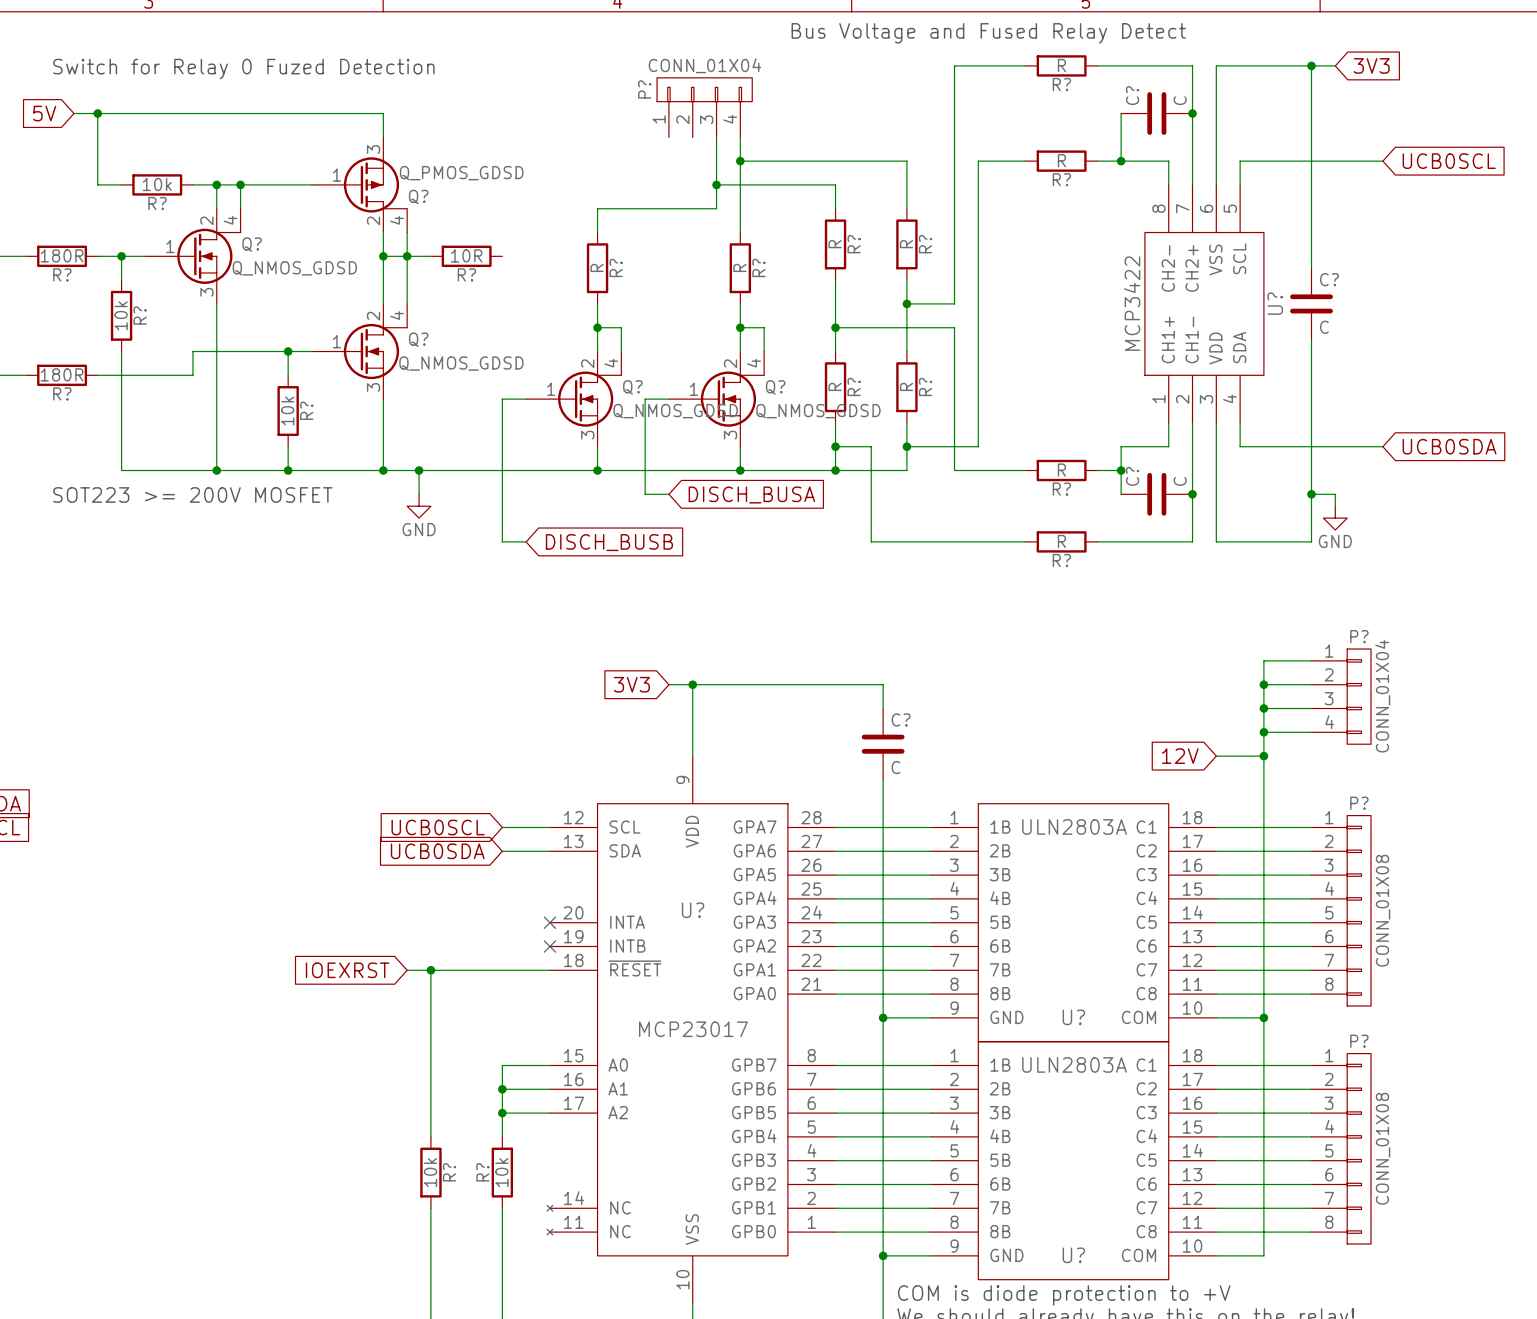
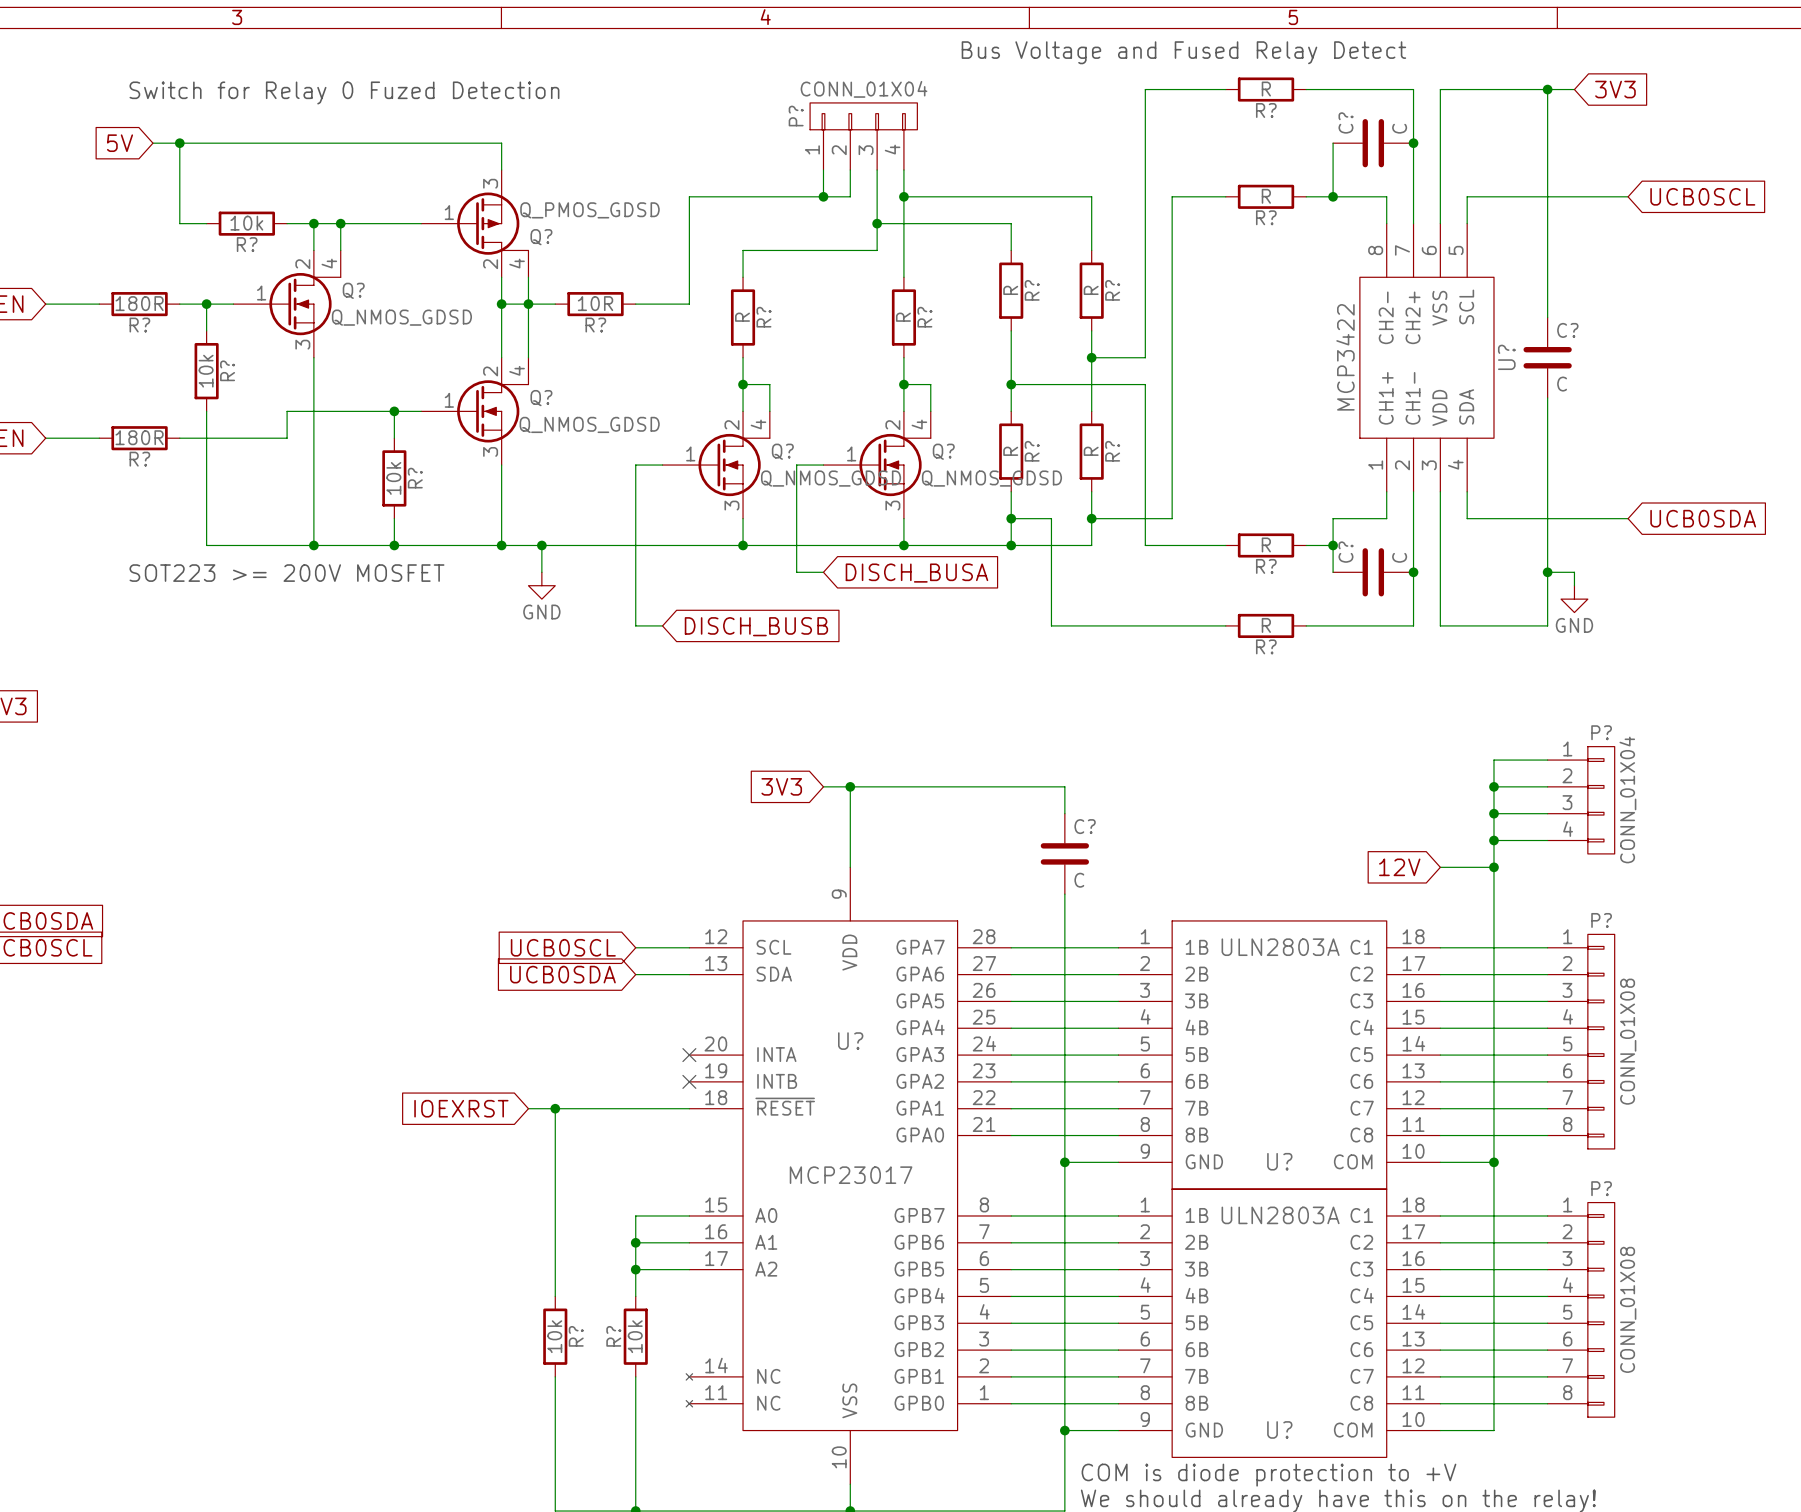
wire: none -> (823, 170) (823, 196)
wire: none -> (850, 170) (850, 196) (689, 196) (689, 304) (635, 304)
junction: none -> (823, 196)

